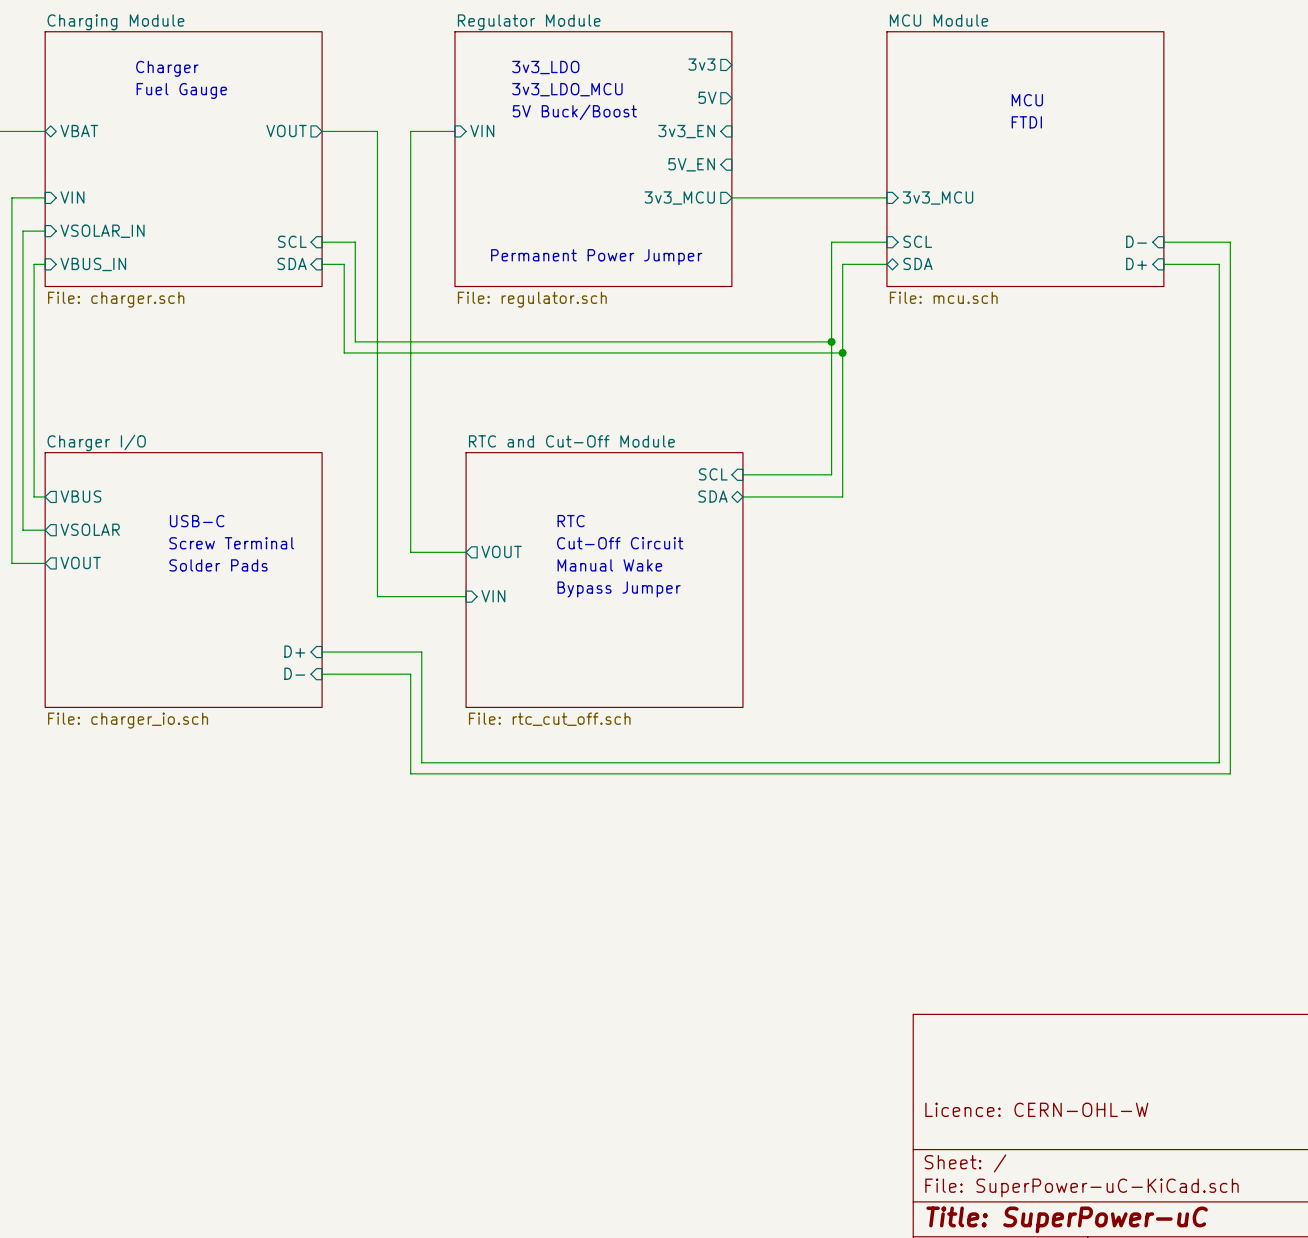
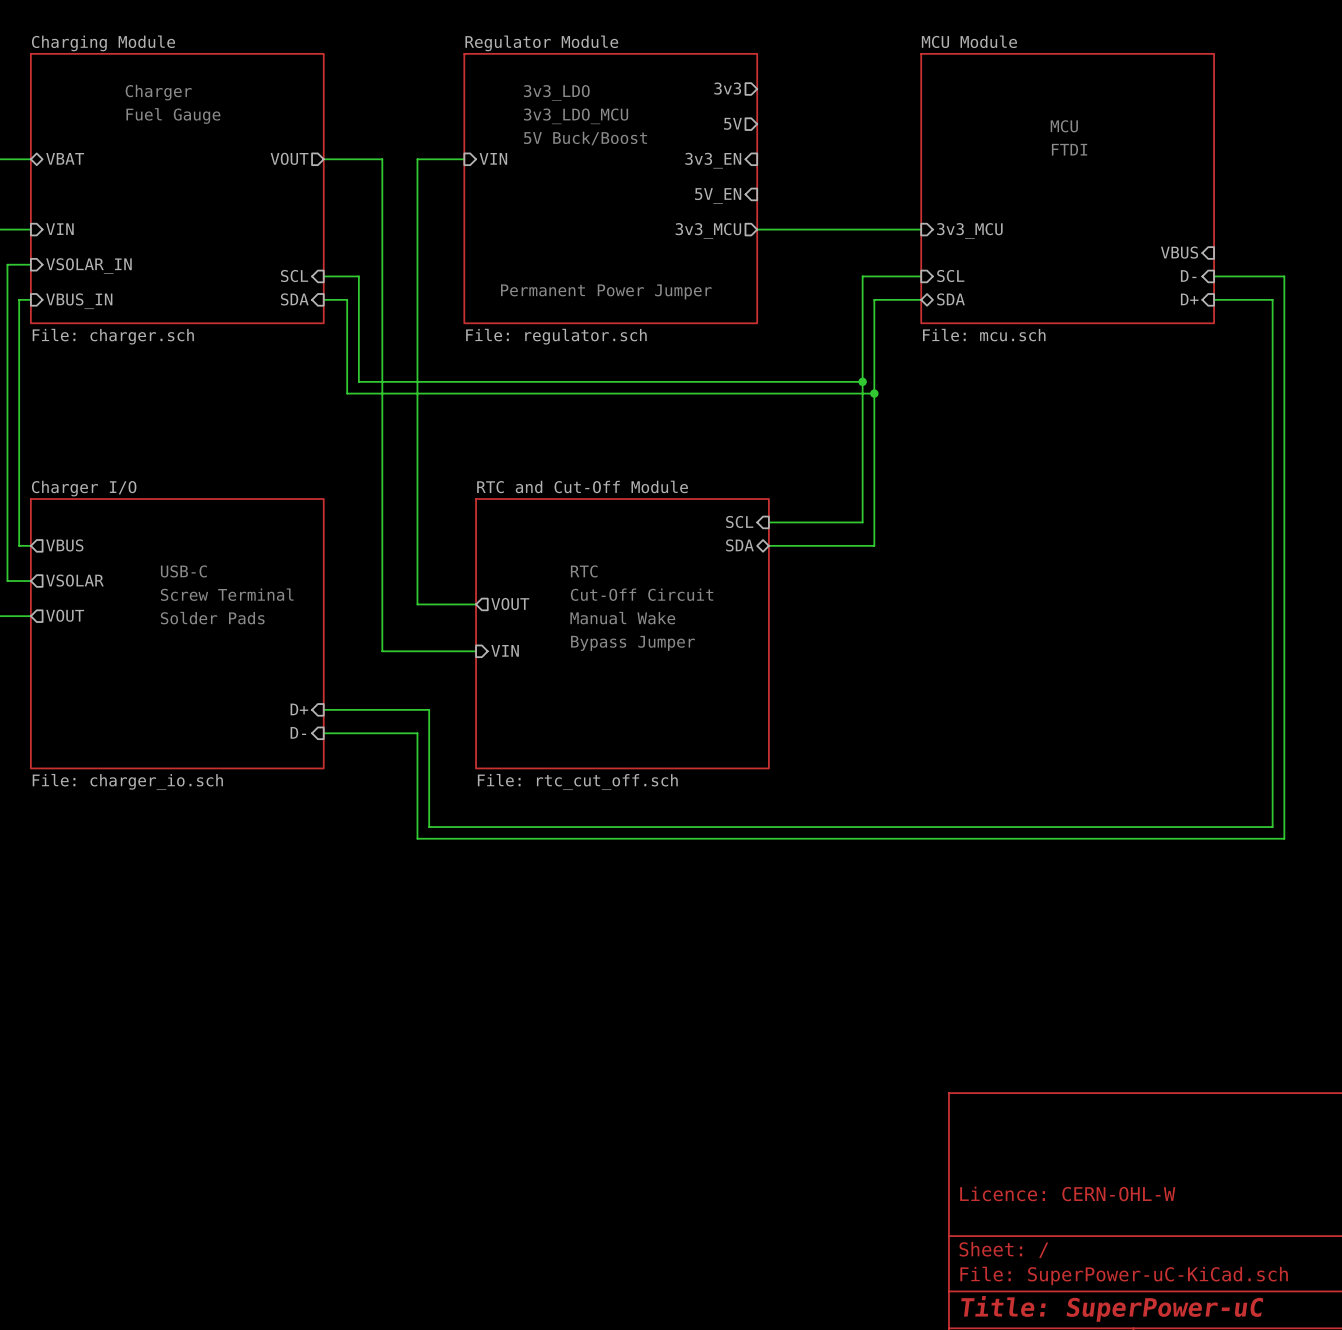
sheet pin: none -> VBUS (1179, 252)

